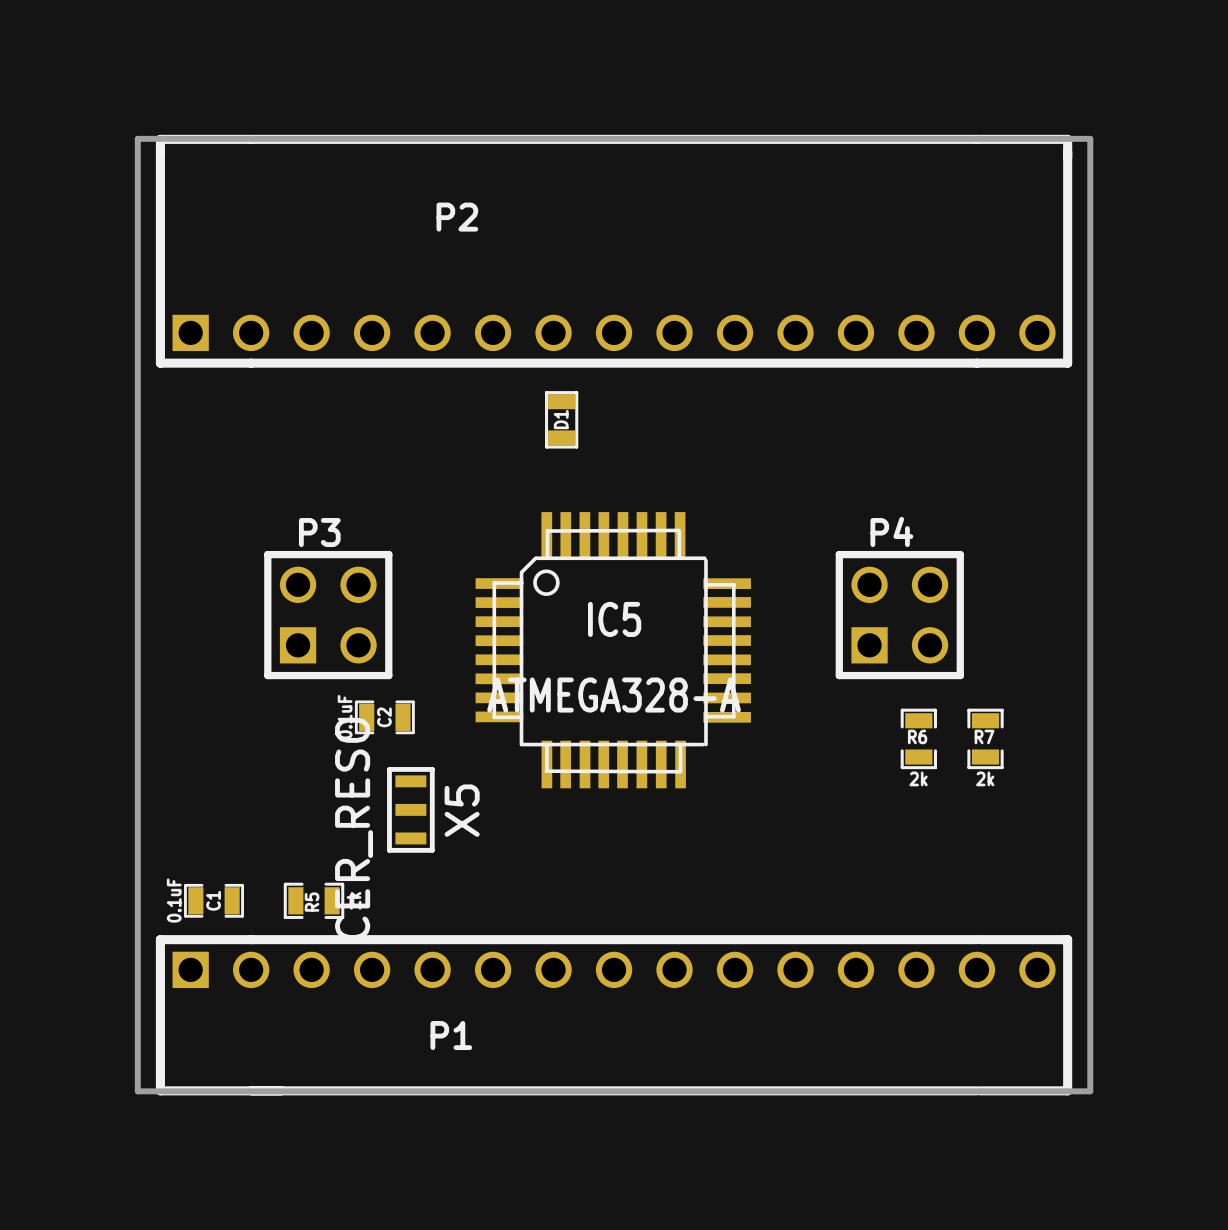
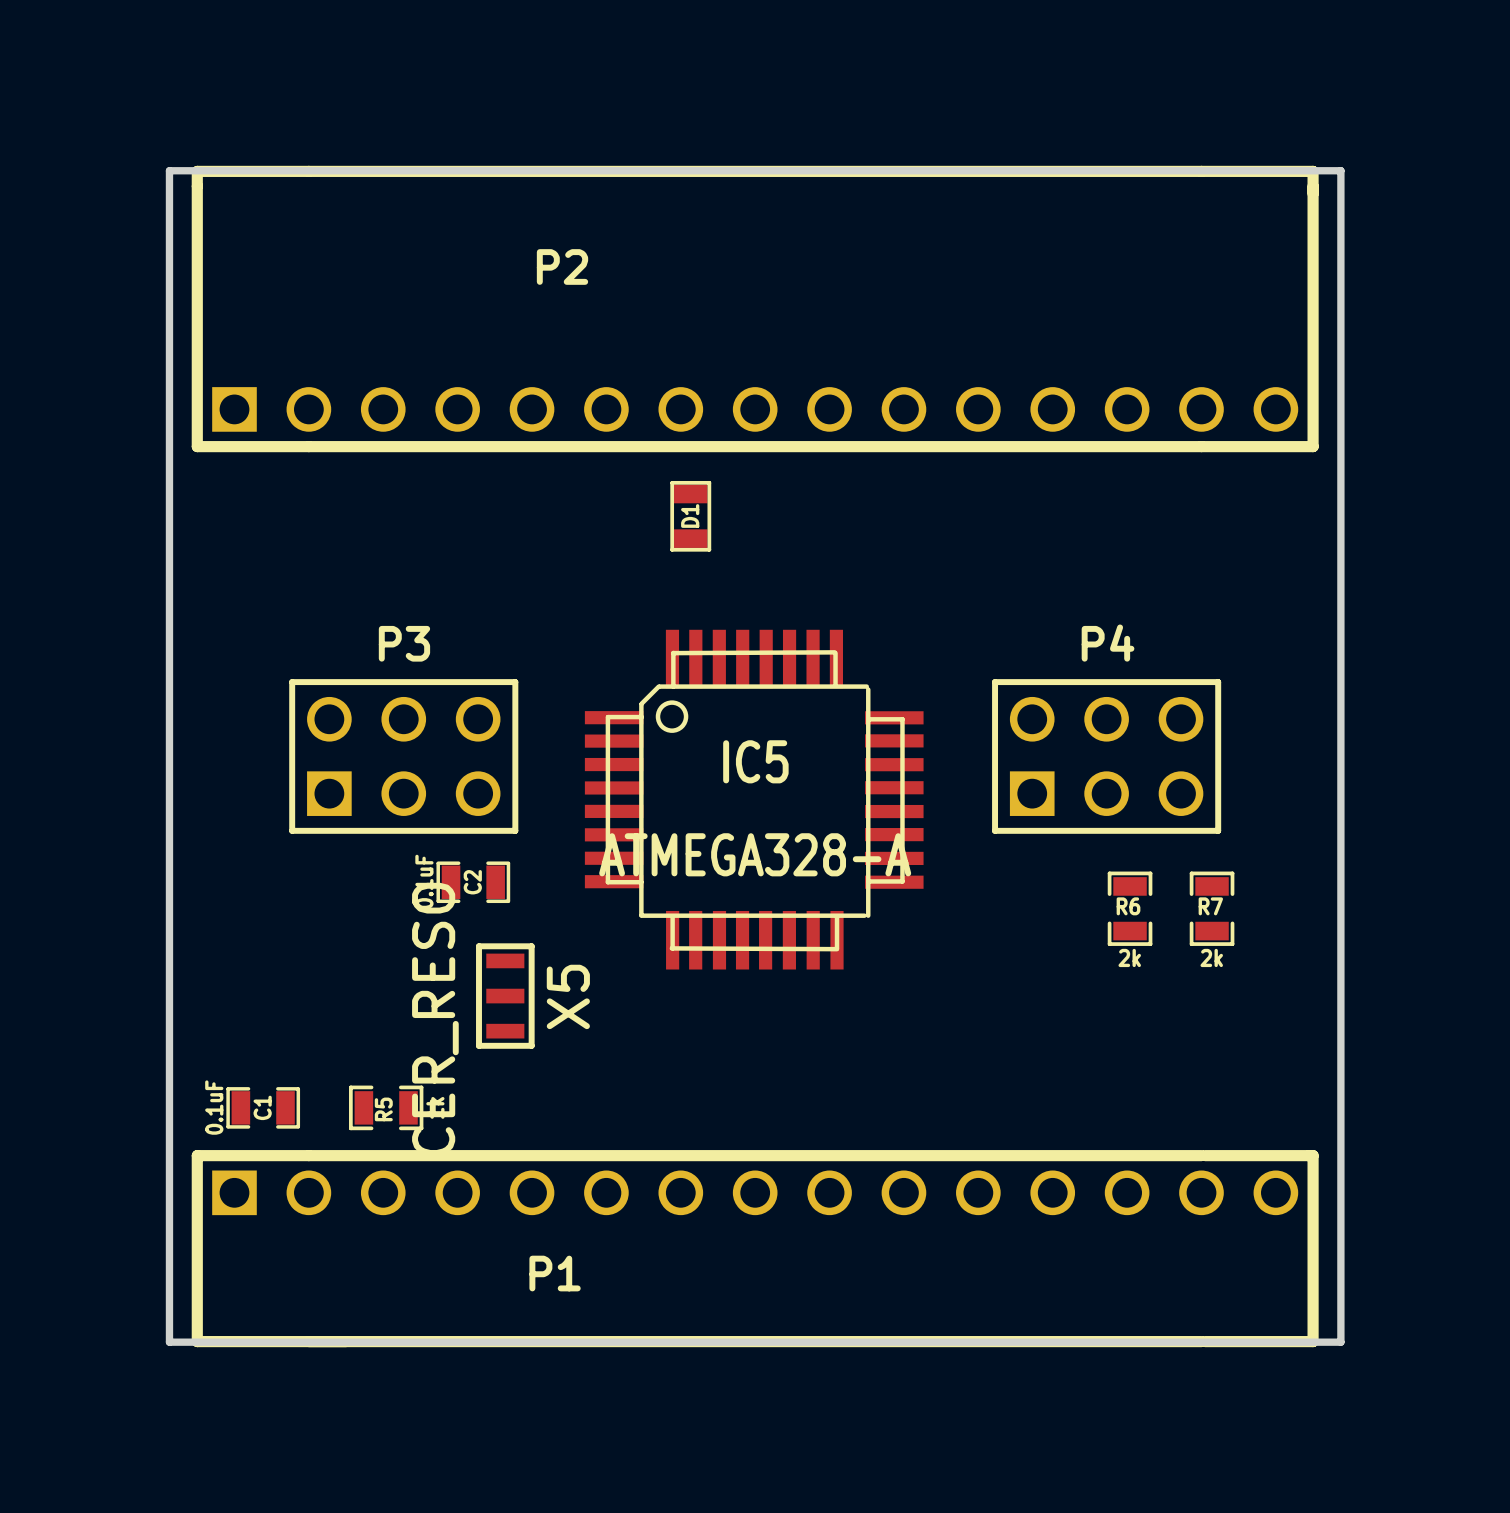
P3 footprint: [264, 550, 393, 680] -> [289, 679, 519, 834]
P4 footprint: [835, 550, 964, 680] -> [992, 679, 1222, 834]

